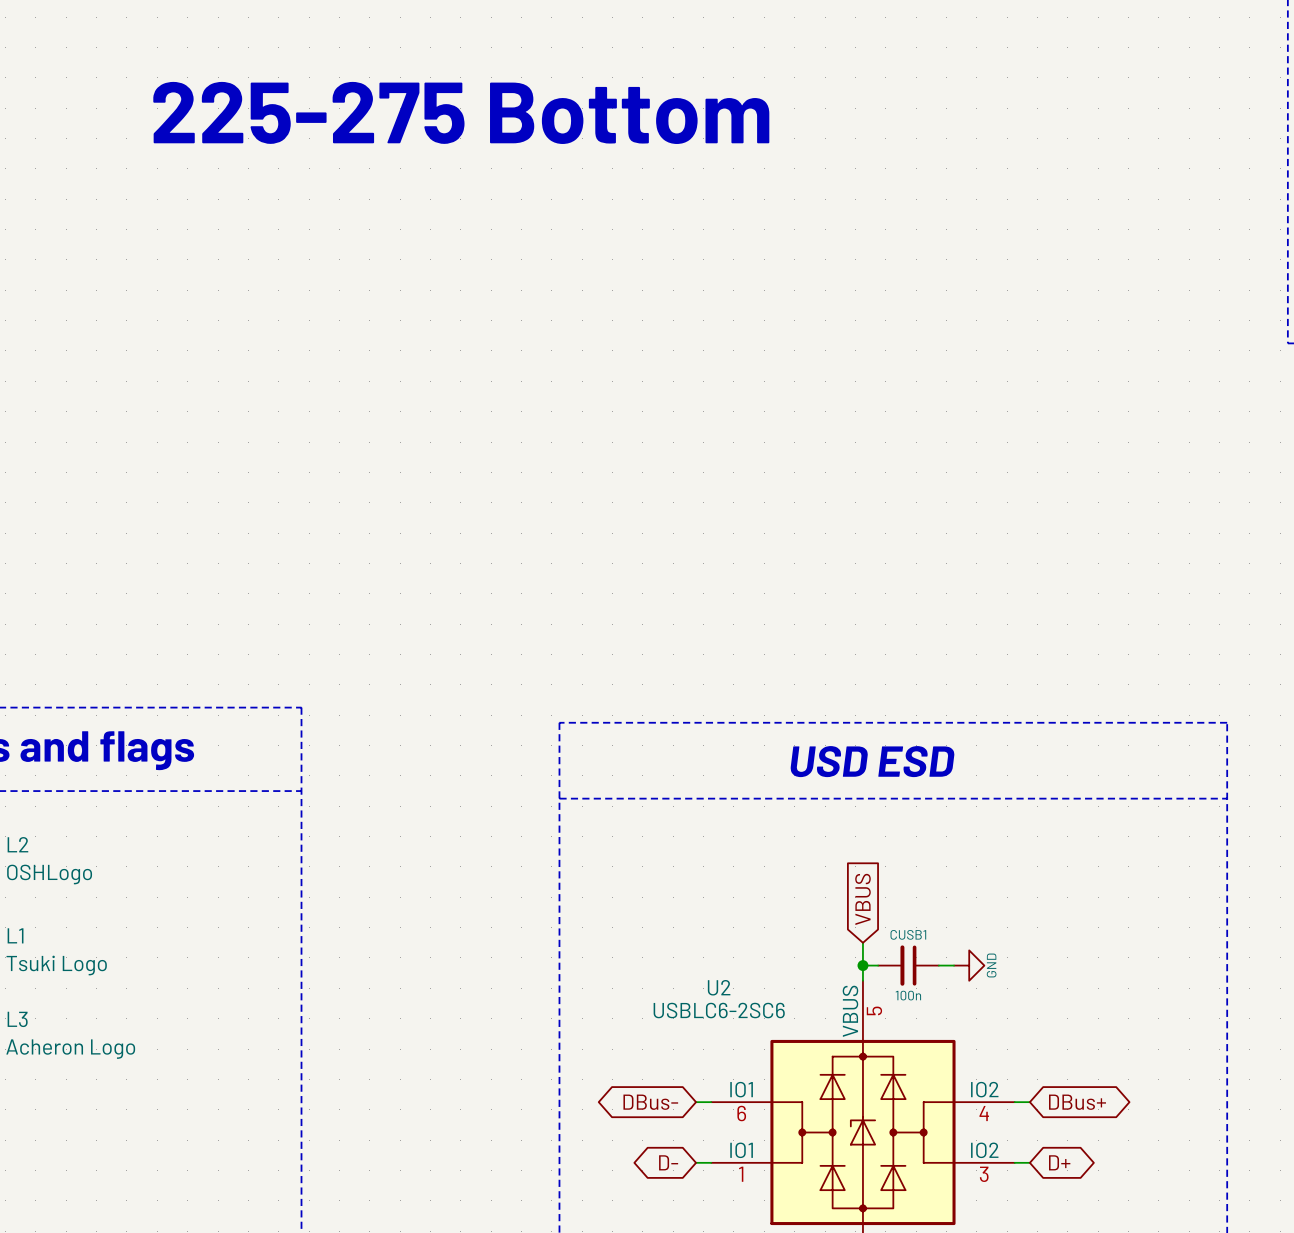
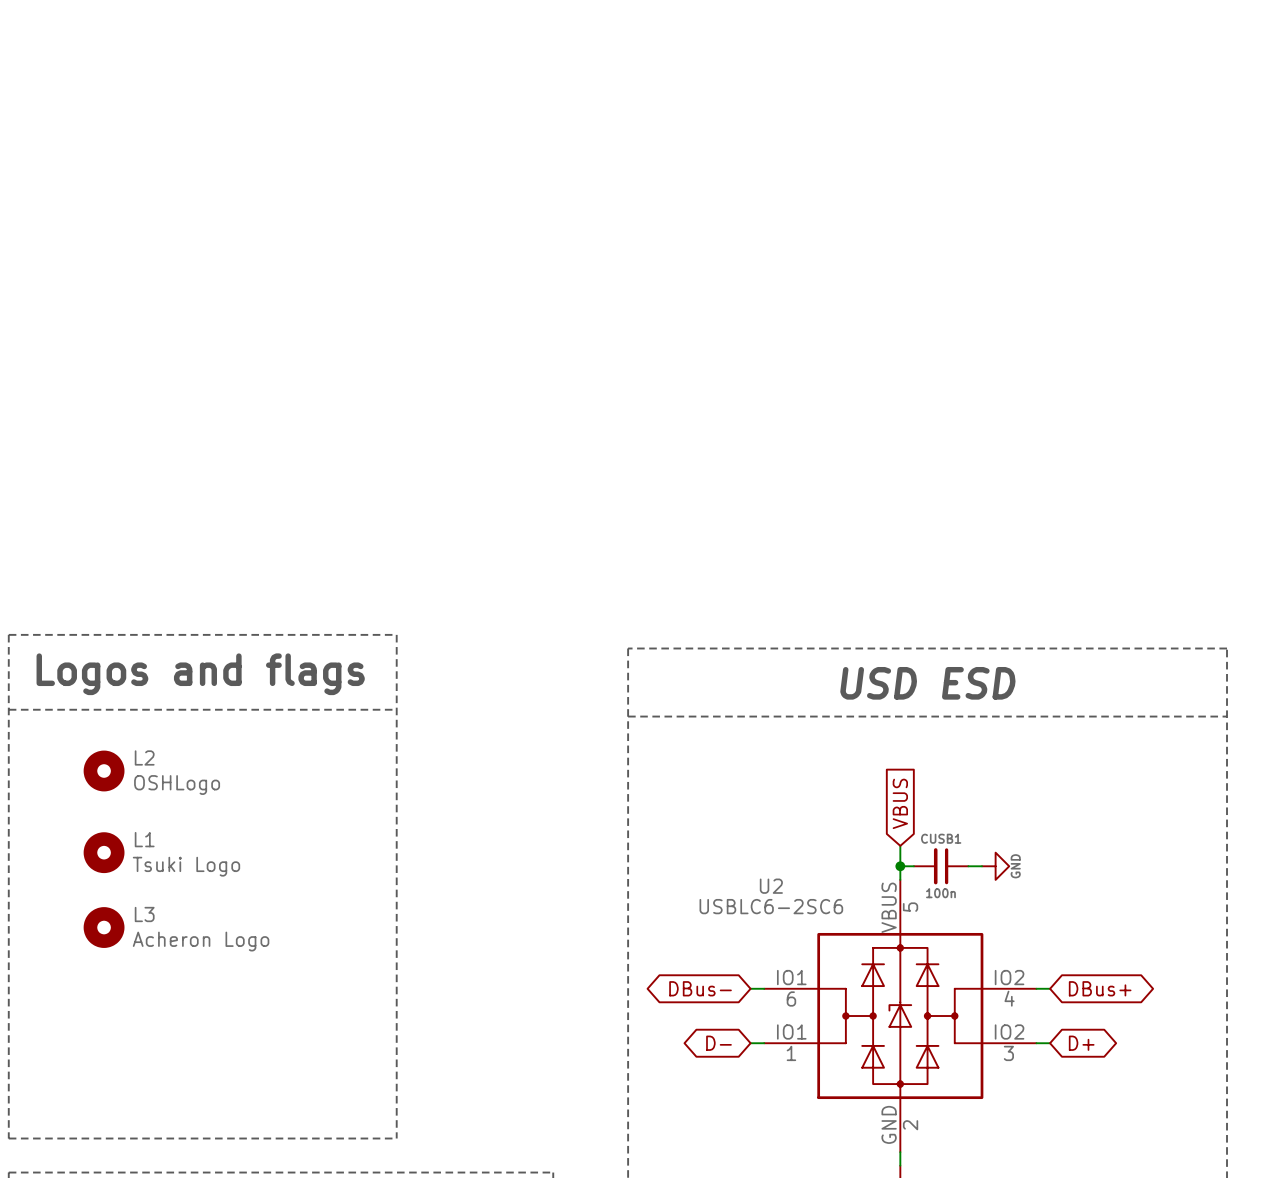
text: 225-275 Bottom (461, 112) -> none

